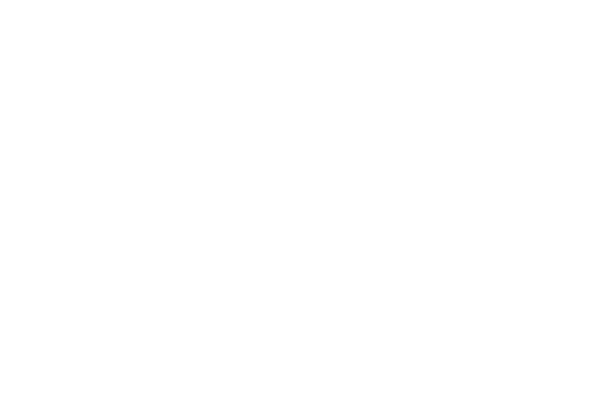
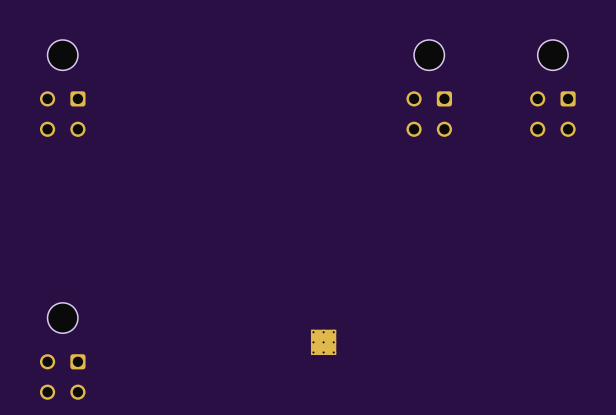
part: none -> (62, 88)
part: none -> (429, 88)
part: none -> (552, 88)
part: none -> (323, 342)
part: none -> (62, 351)

